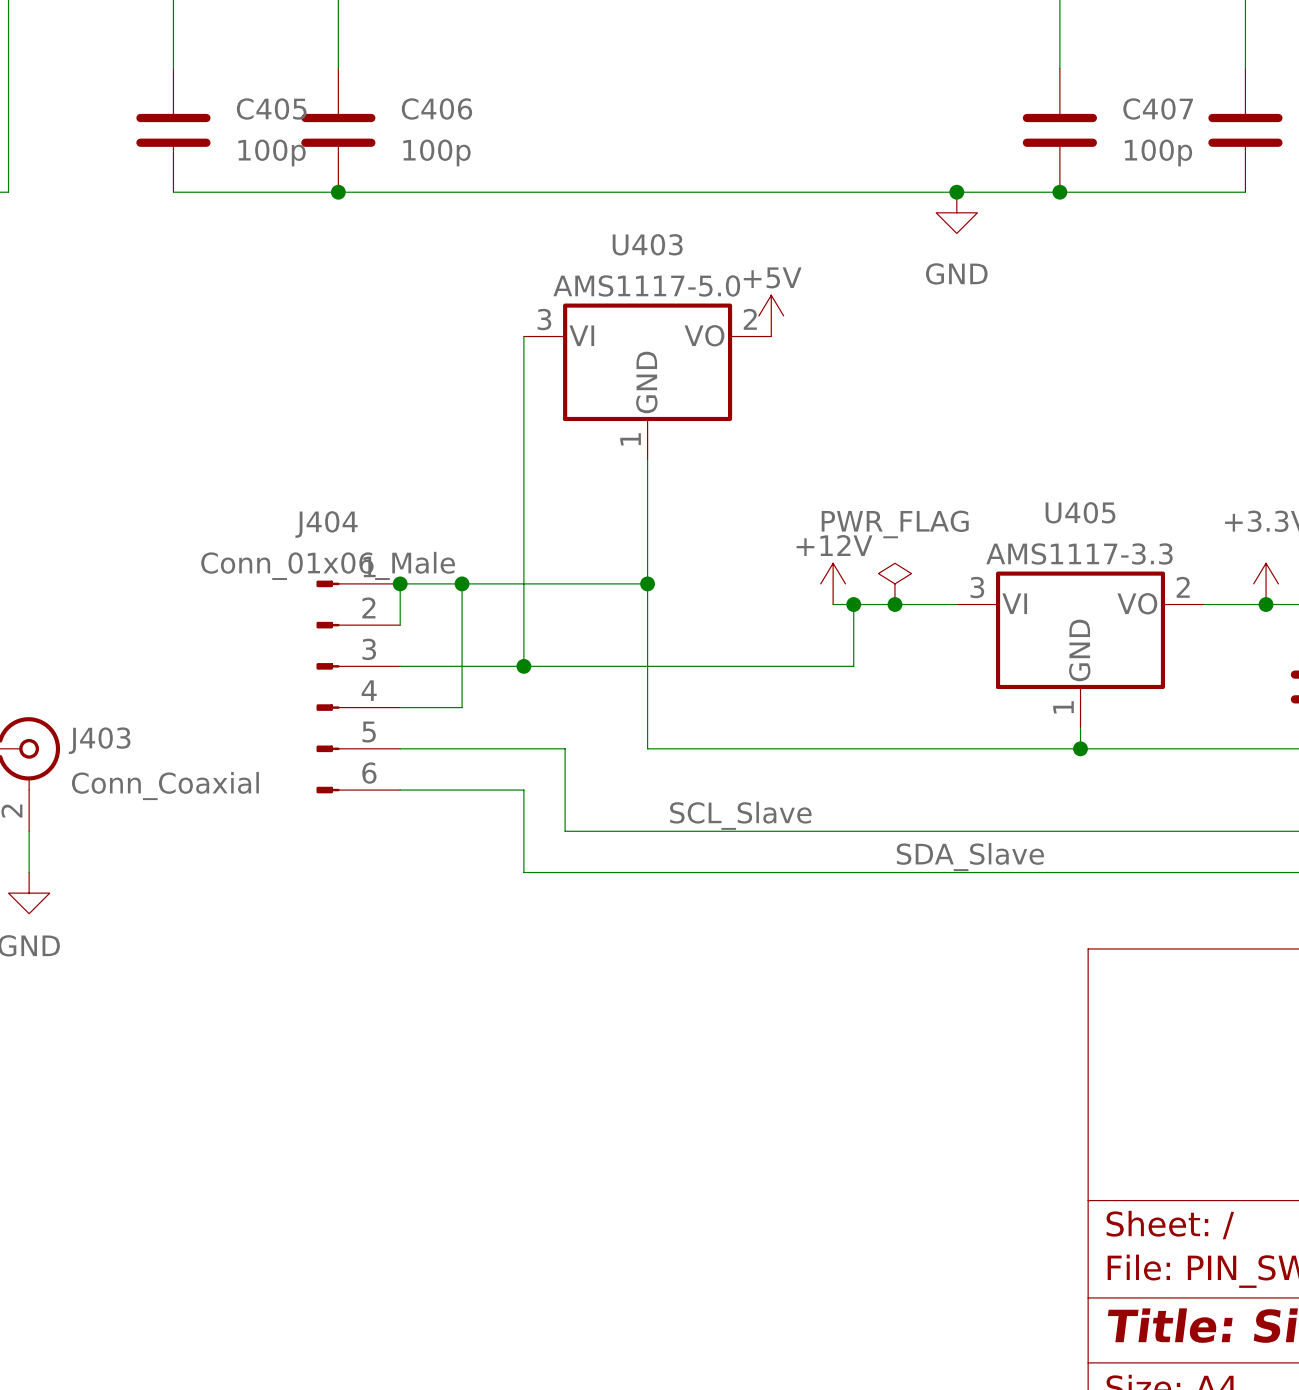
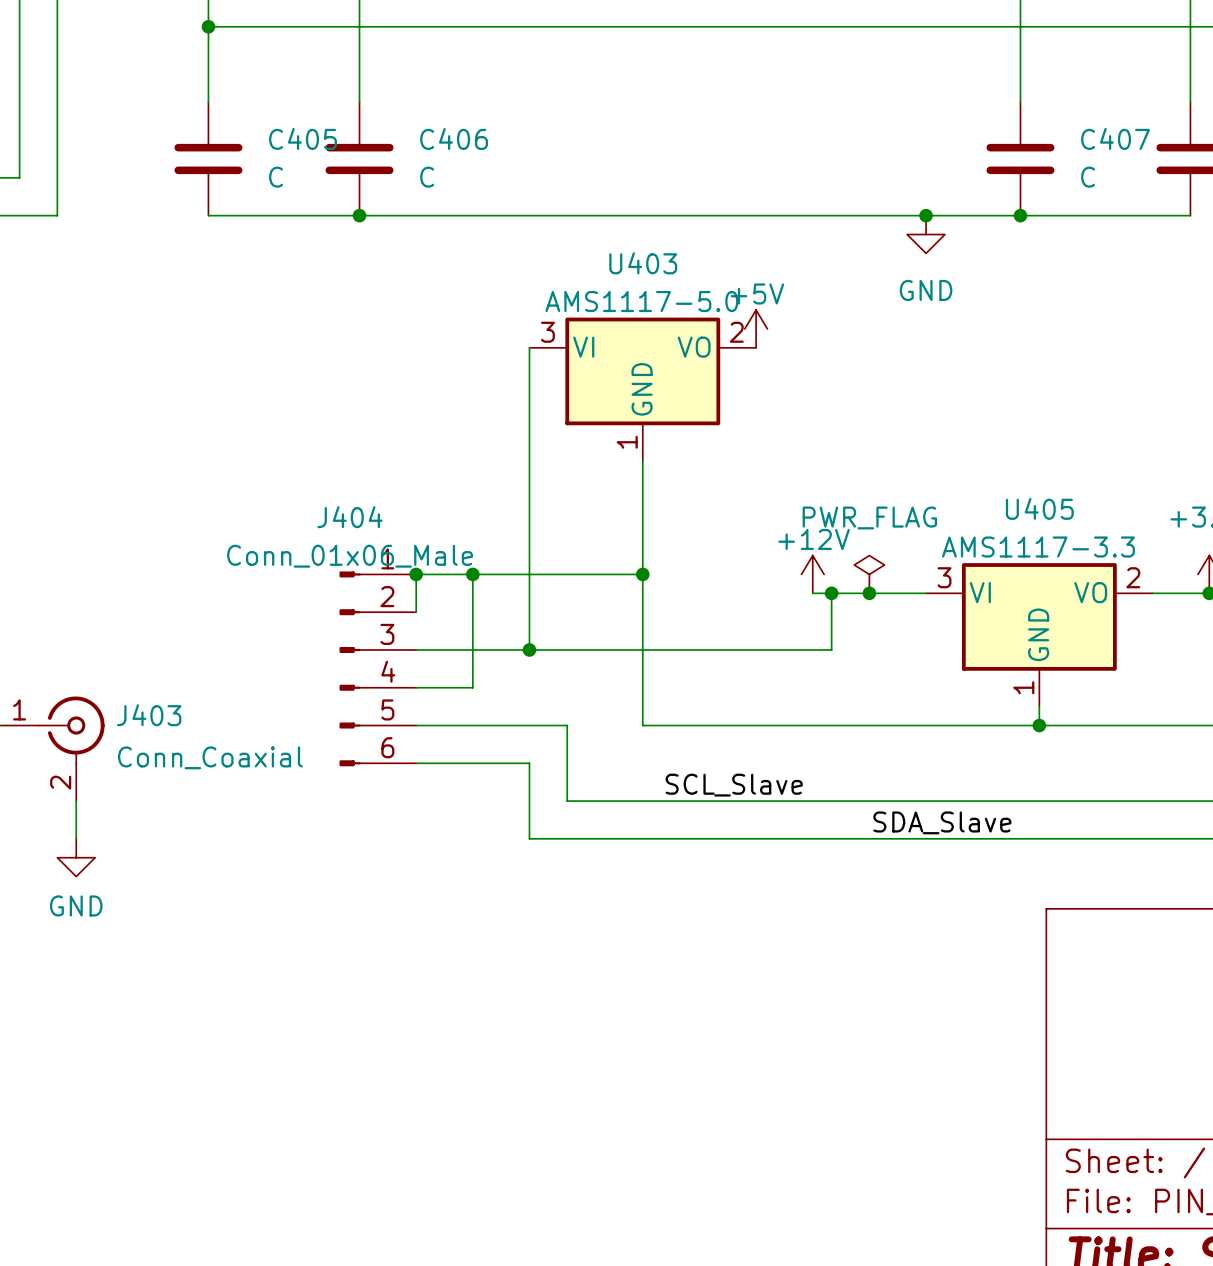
C405 value: 100p (272, 152) -> C (276, 177)
C406 value: 100p (436, 152) -> C (427, 177)
C407 value: 100p (1158, 152) -> C (1088, 177)

